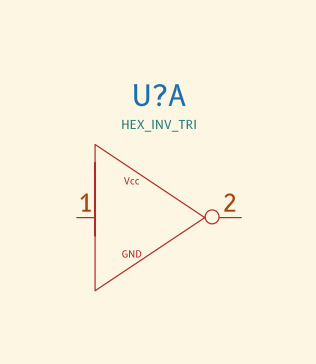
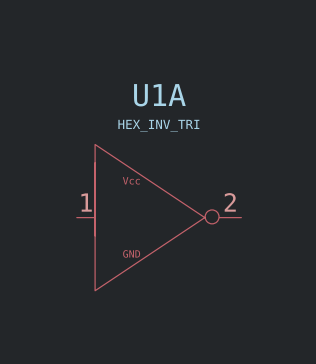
U?A name: U?A (159, 95) -> U1A (159, 95)

